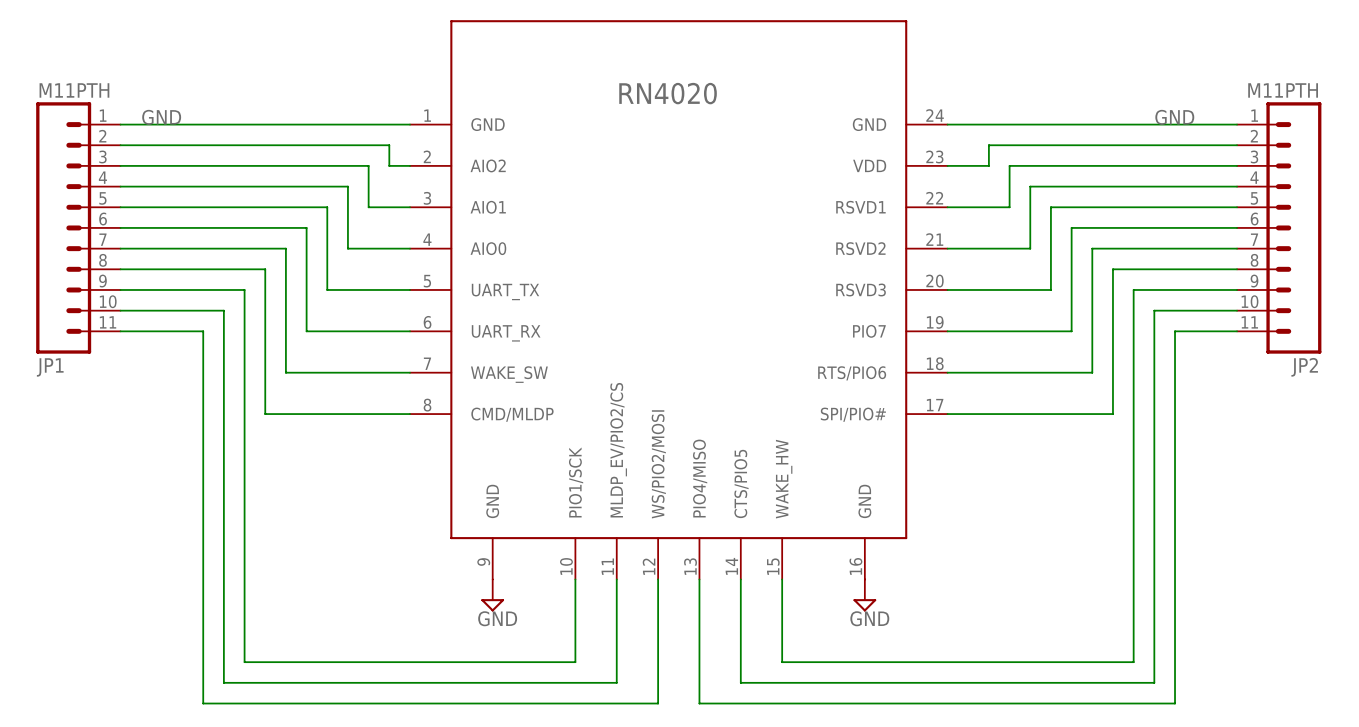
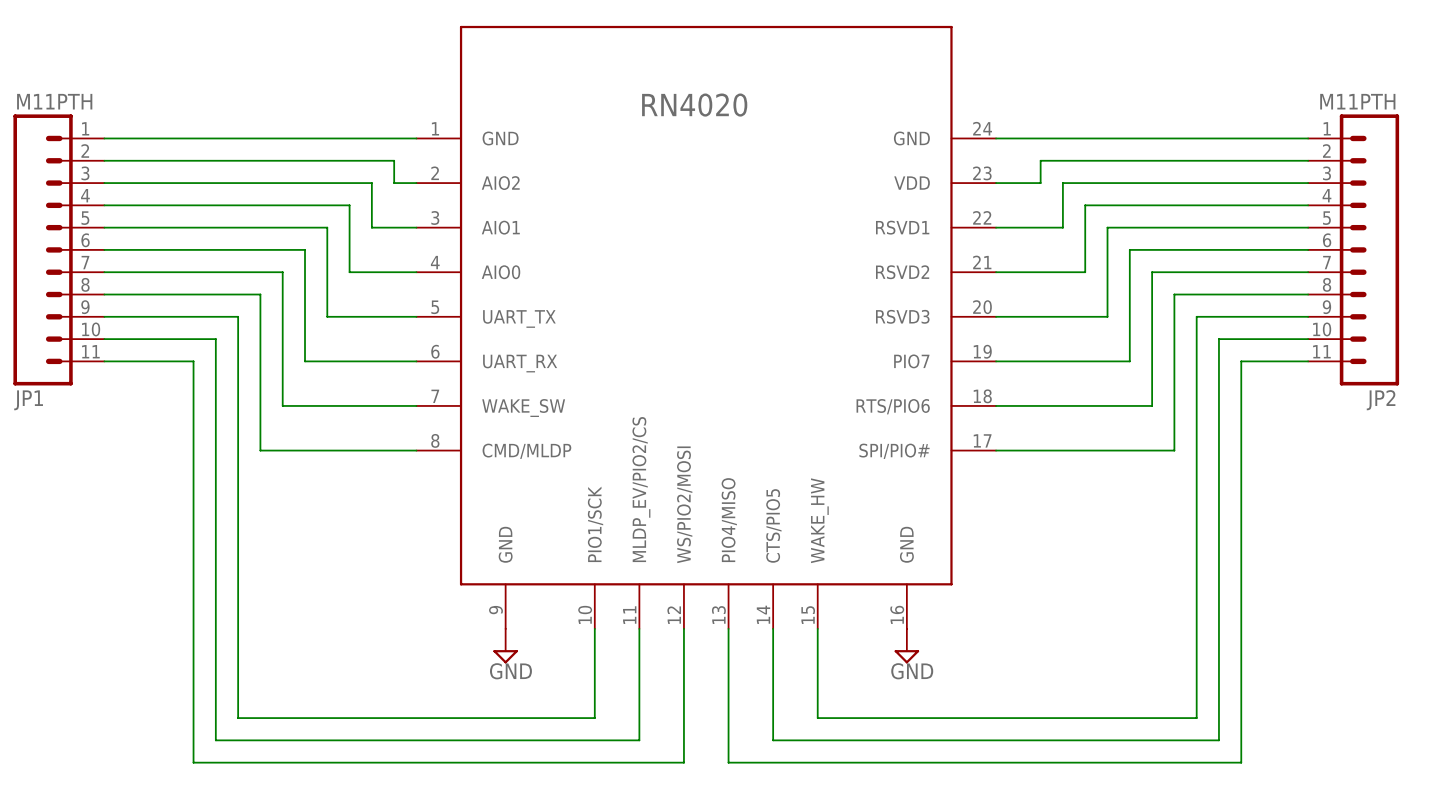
label: GND (161, 117) -> none
label: GND (1174, 117) -> none

